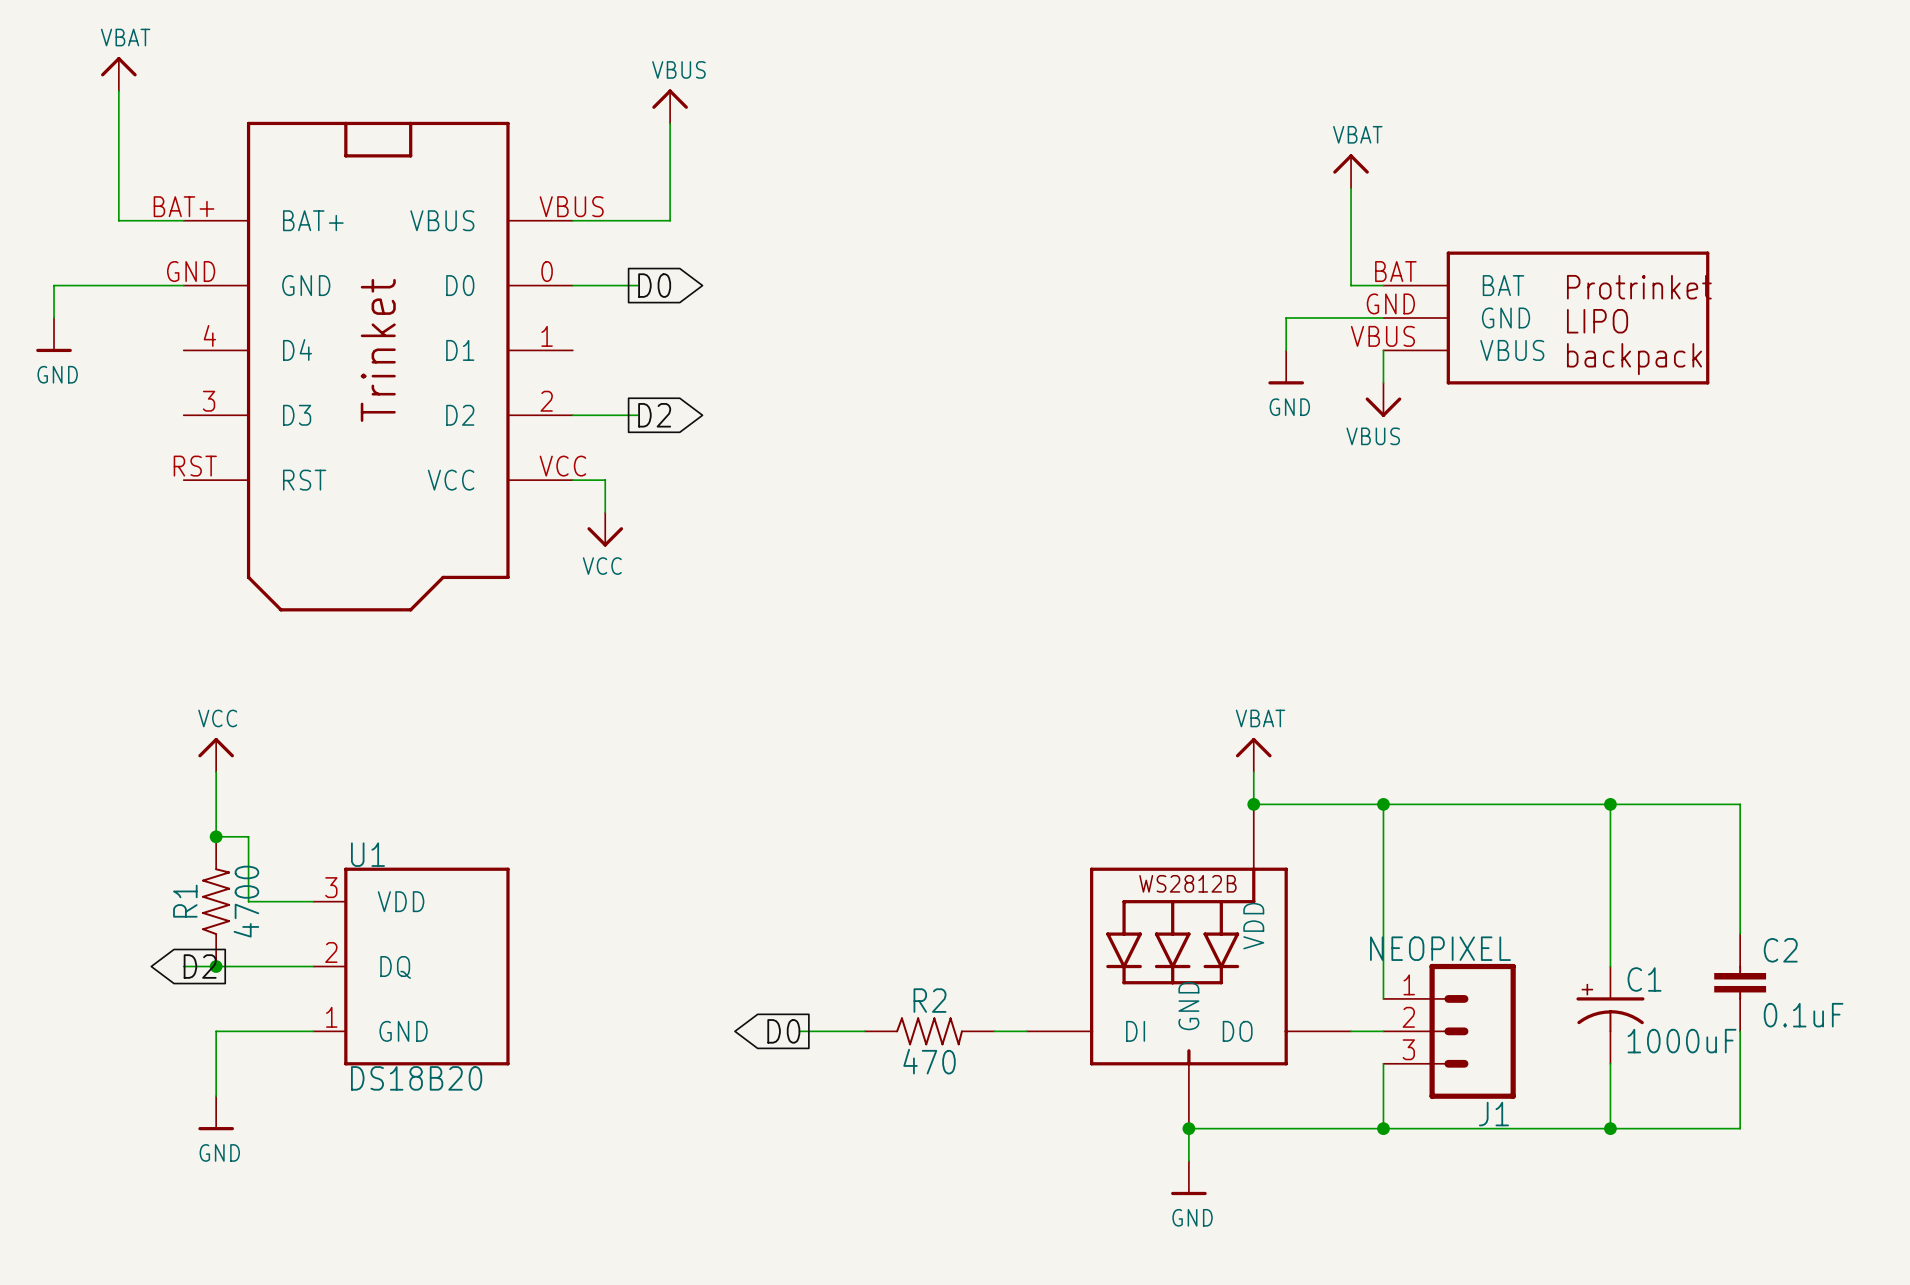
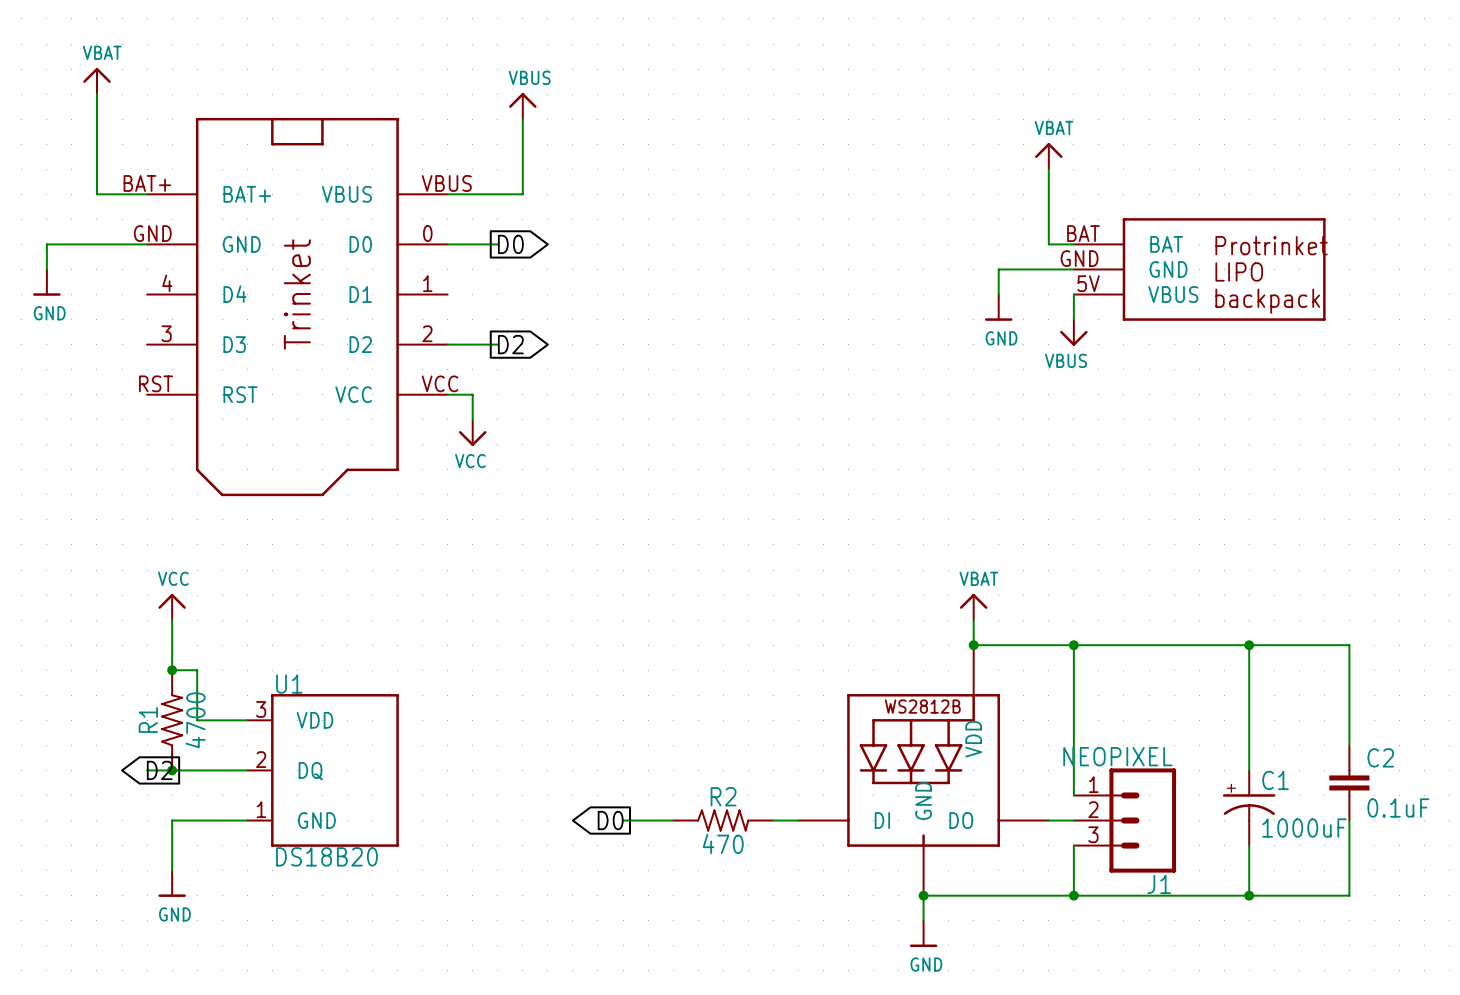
part pin number: VBUS (1382, 336) -> 5V (1088, 283)

